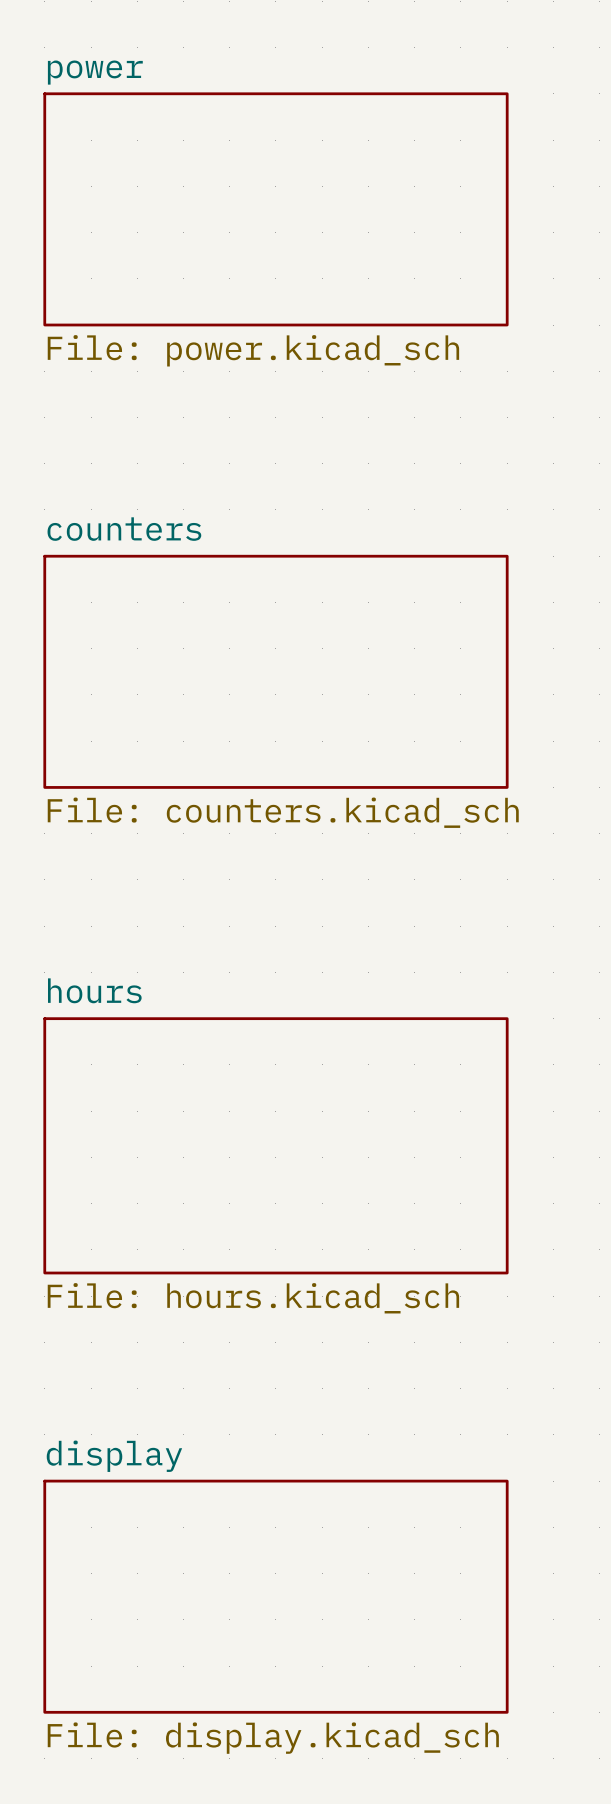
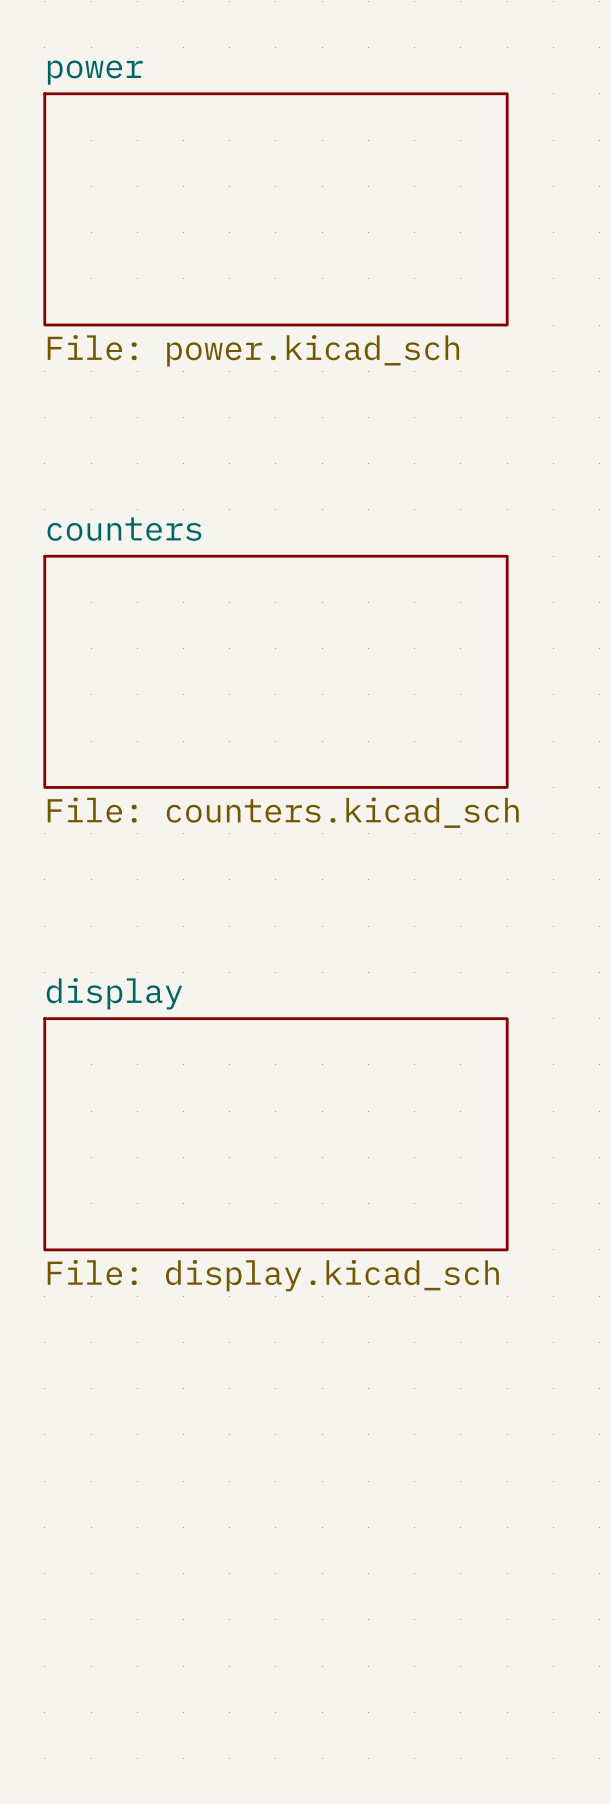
sheet display: none -> File: display.kicad_sch (275, 1134)
sheet hours: File: hours.kicad_sch (275, 1145) -> none
sheet display: File: display.kicad_sch (275, 1596) -> none

